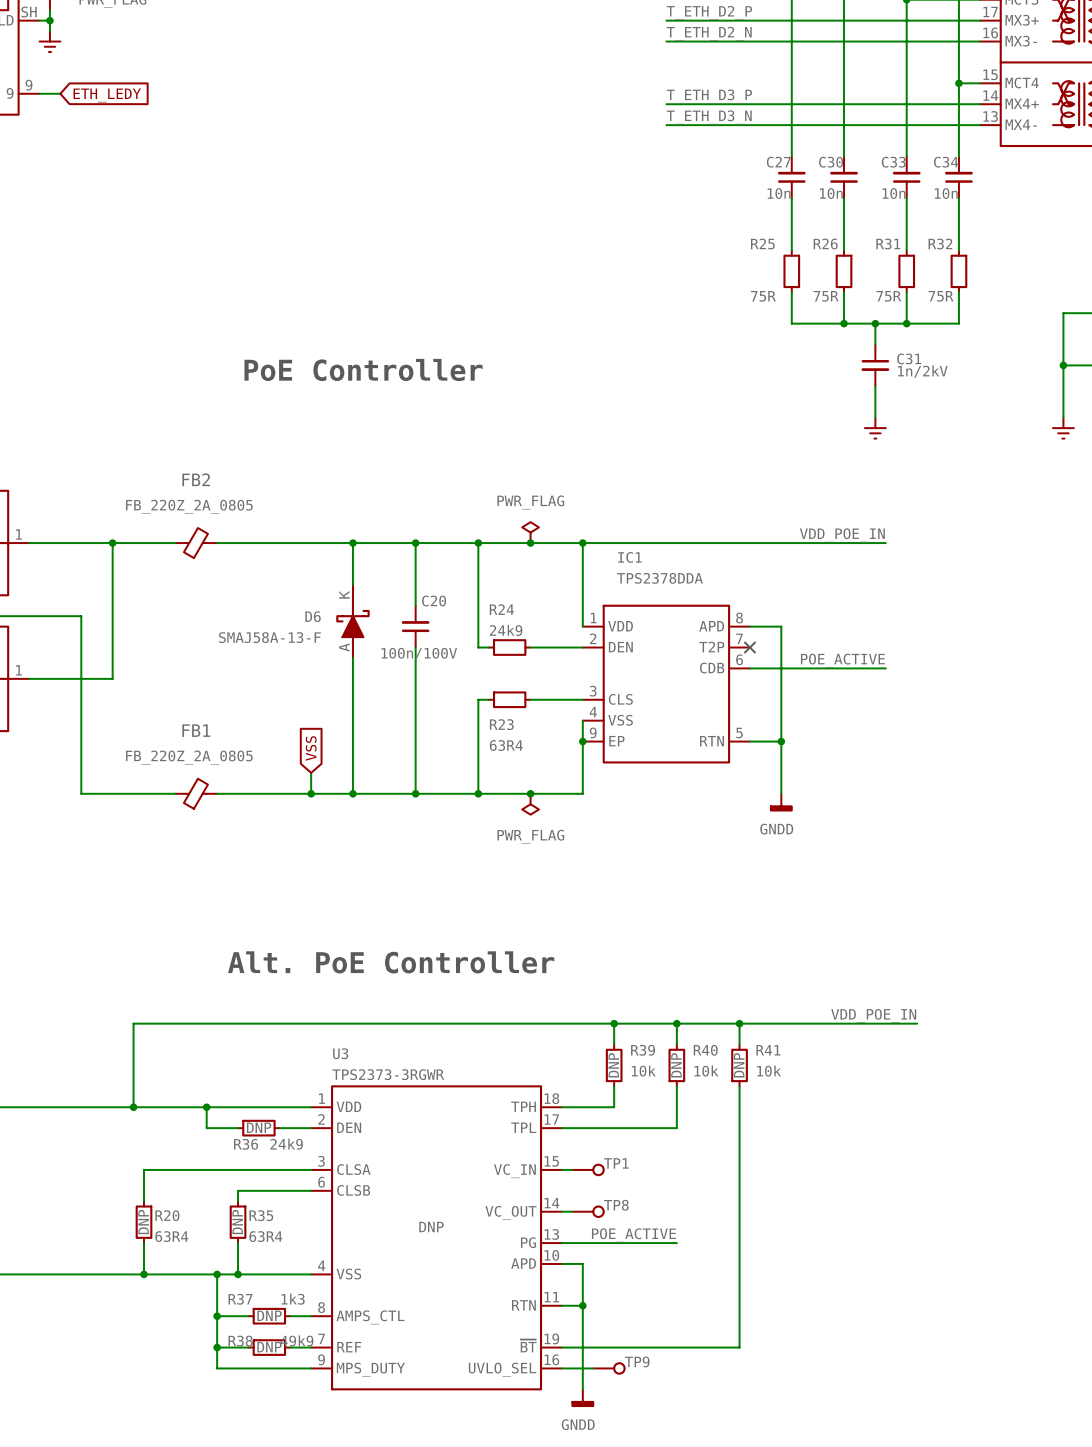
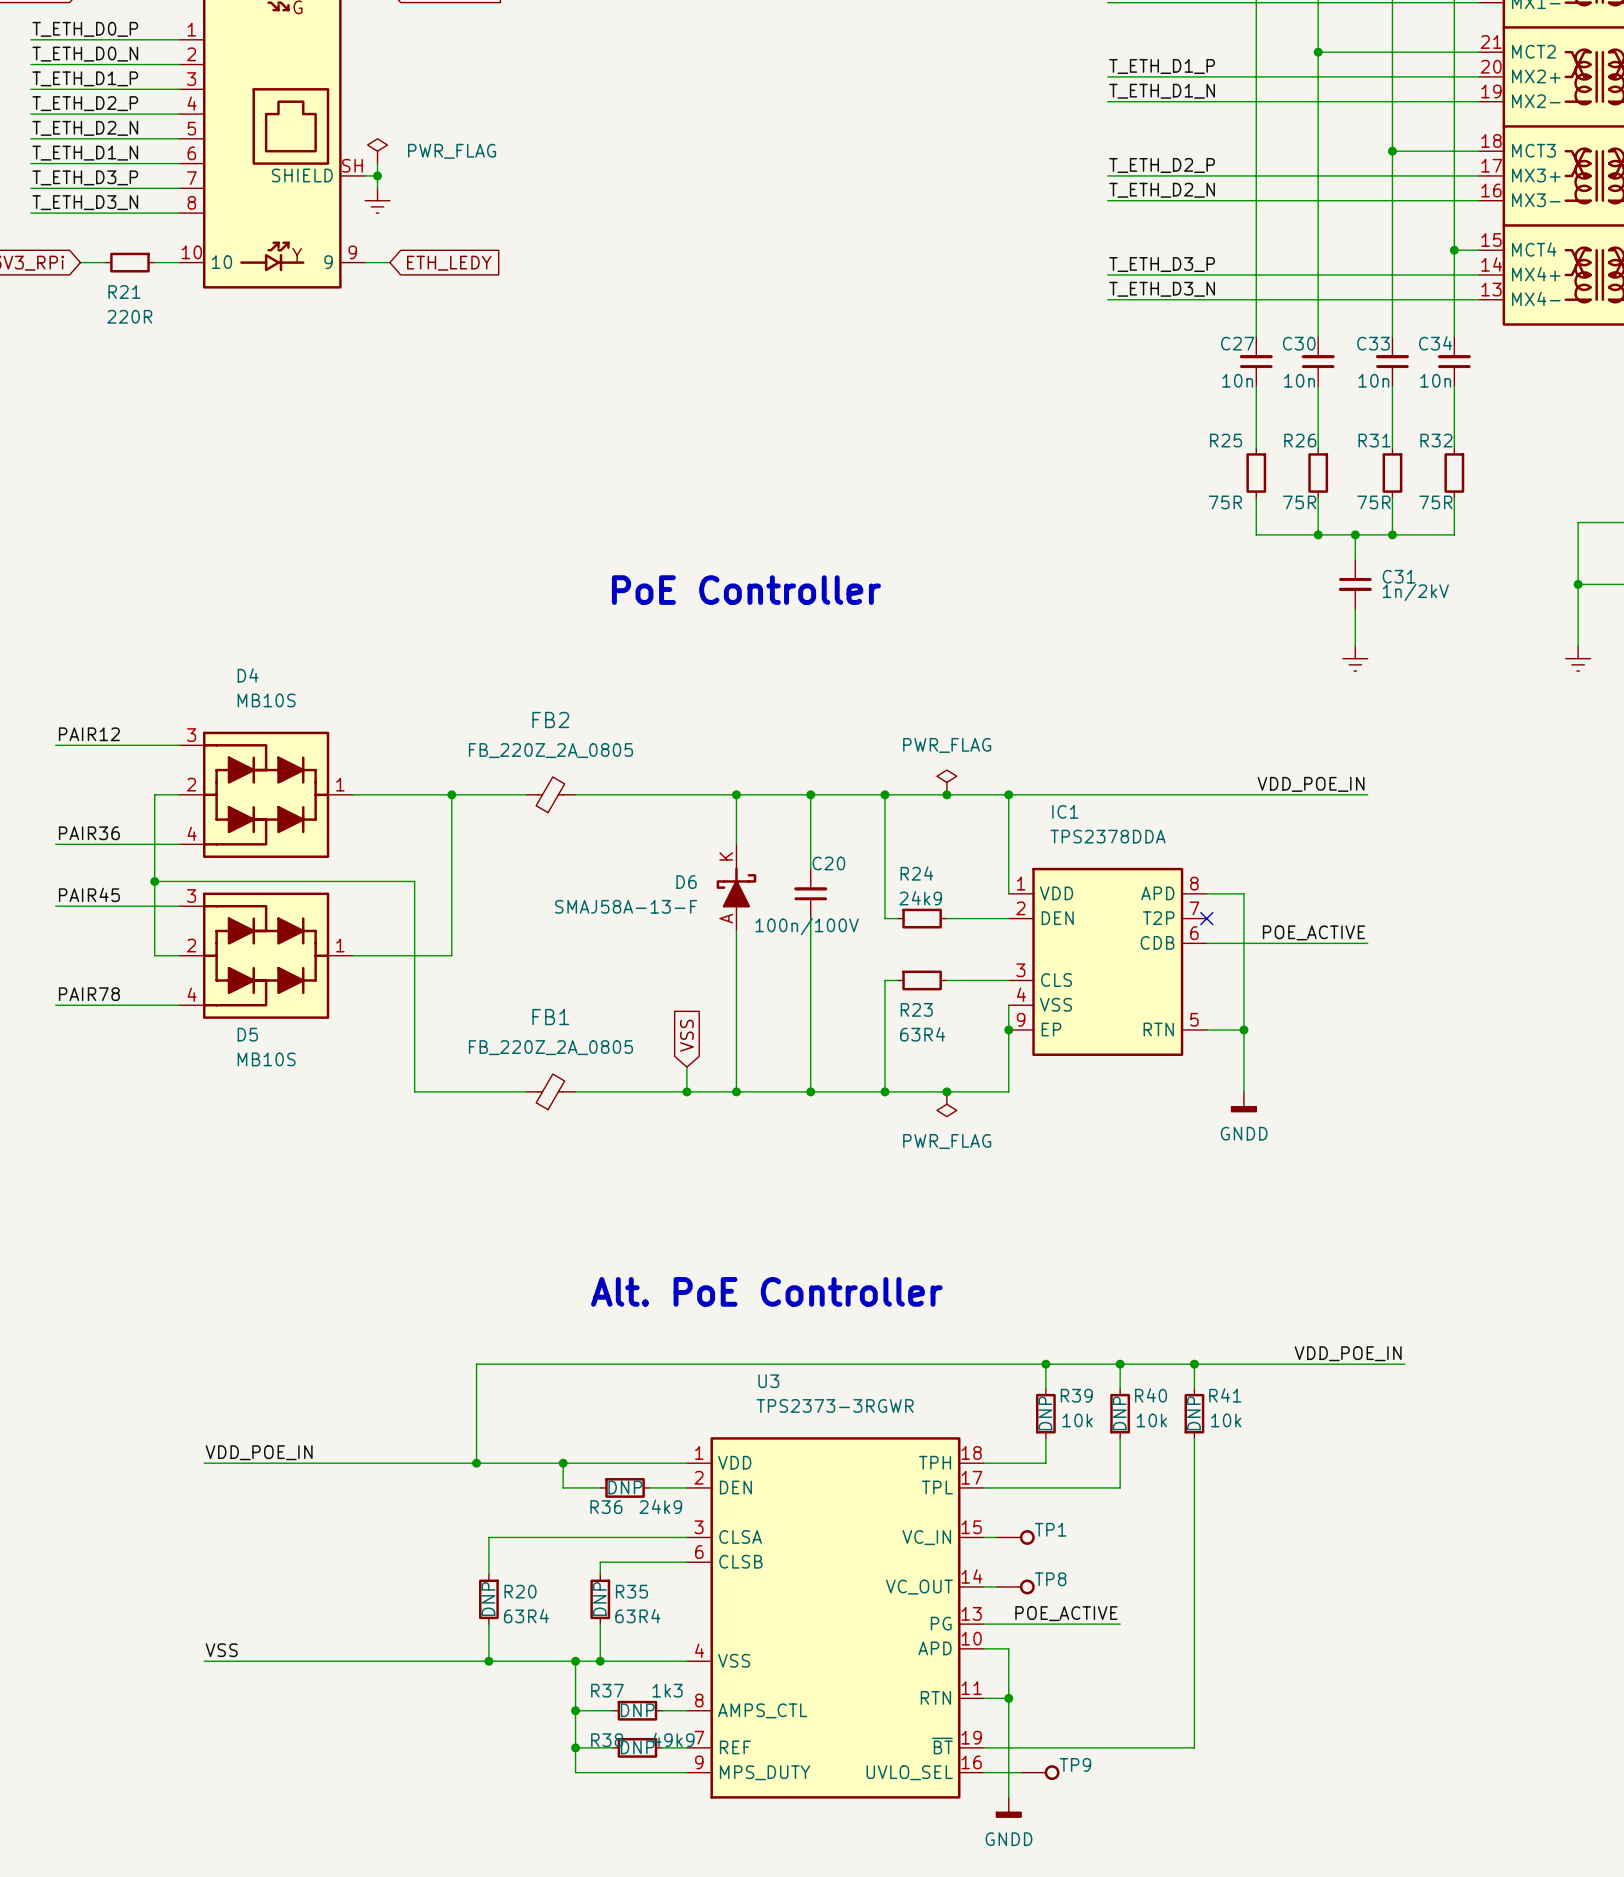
U3 name position: U3 (340, 1053) -> U3 (768, 1381)
U3 text position: TPS2373-3RGWR (388, 1074) -> TPS2373-3RGWR (835, 1405)
U3 text: DNP (431, 1227) -> none

